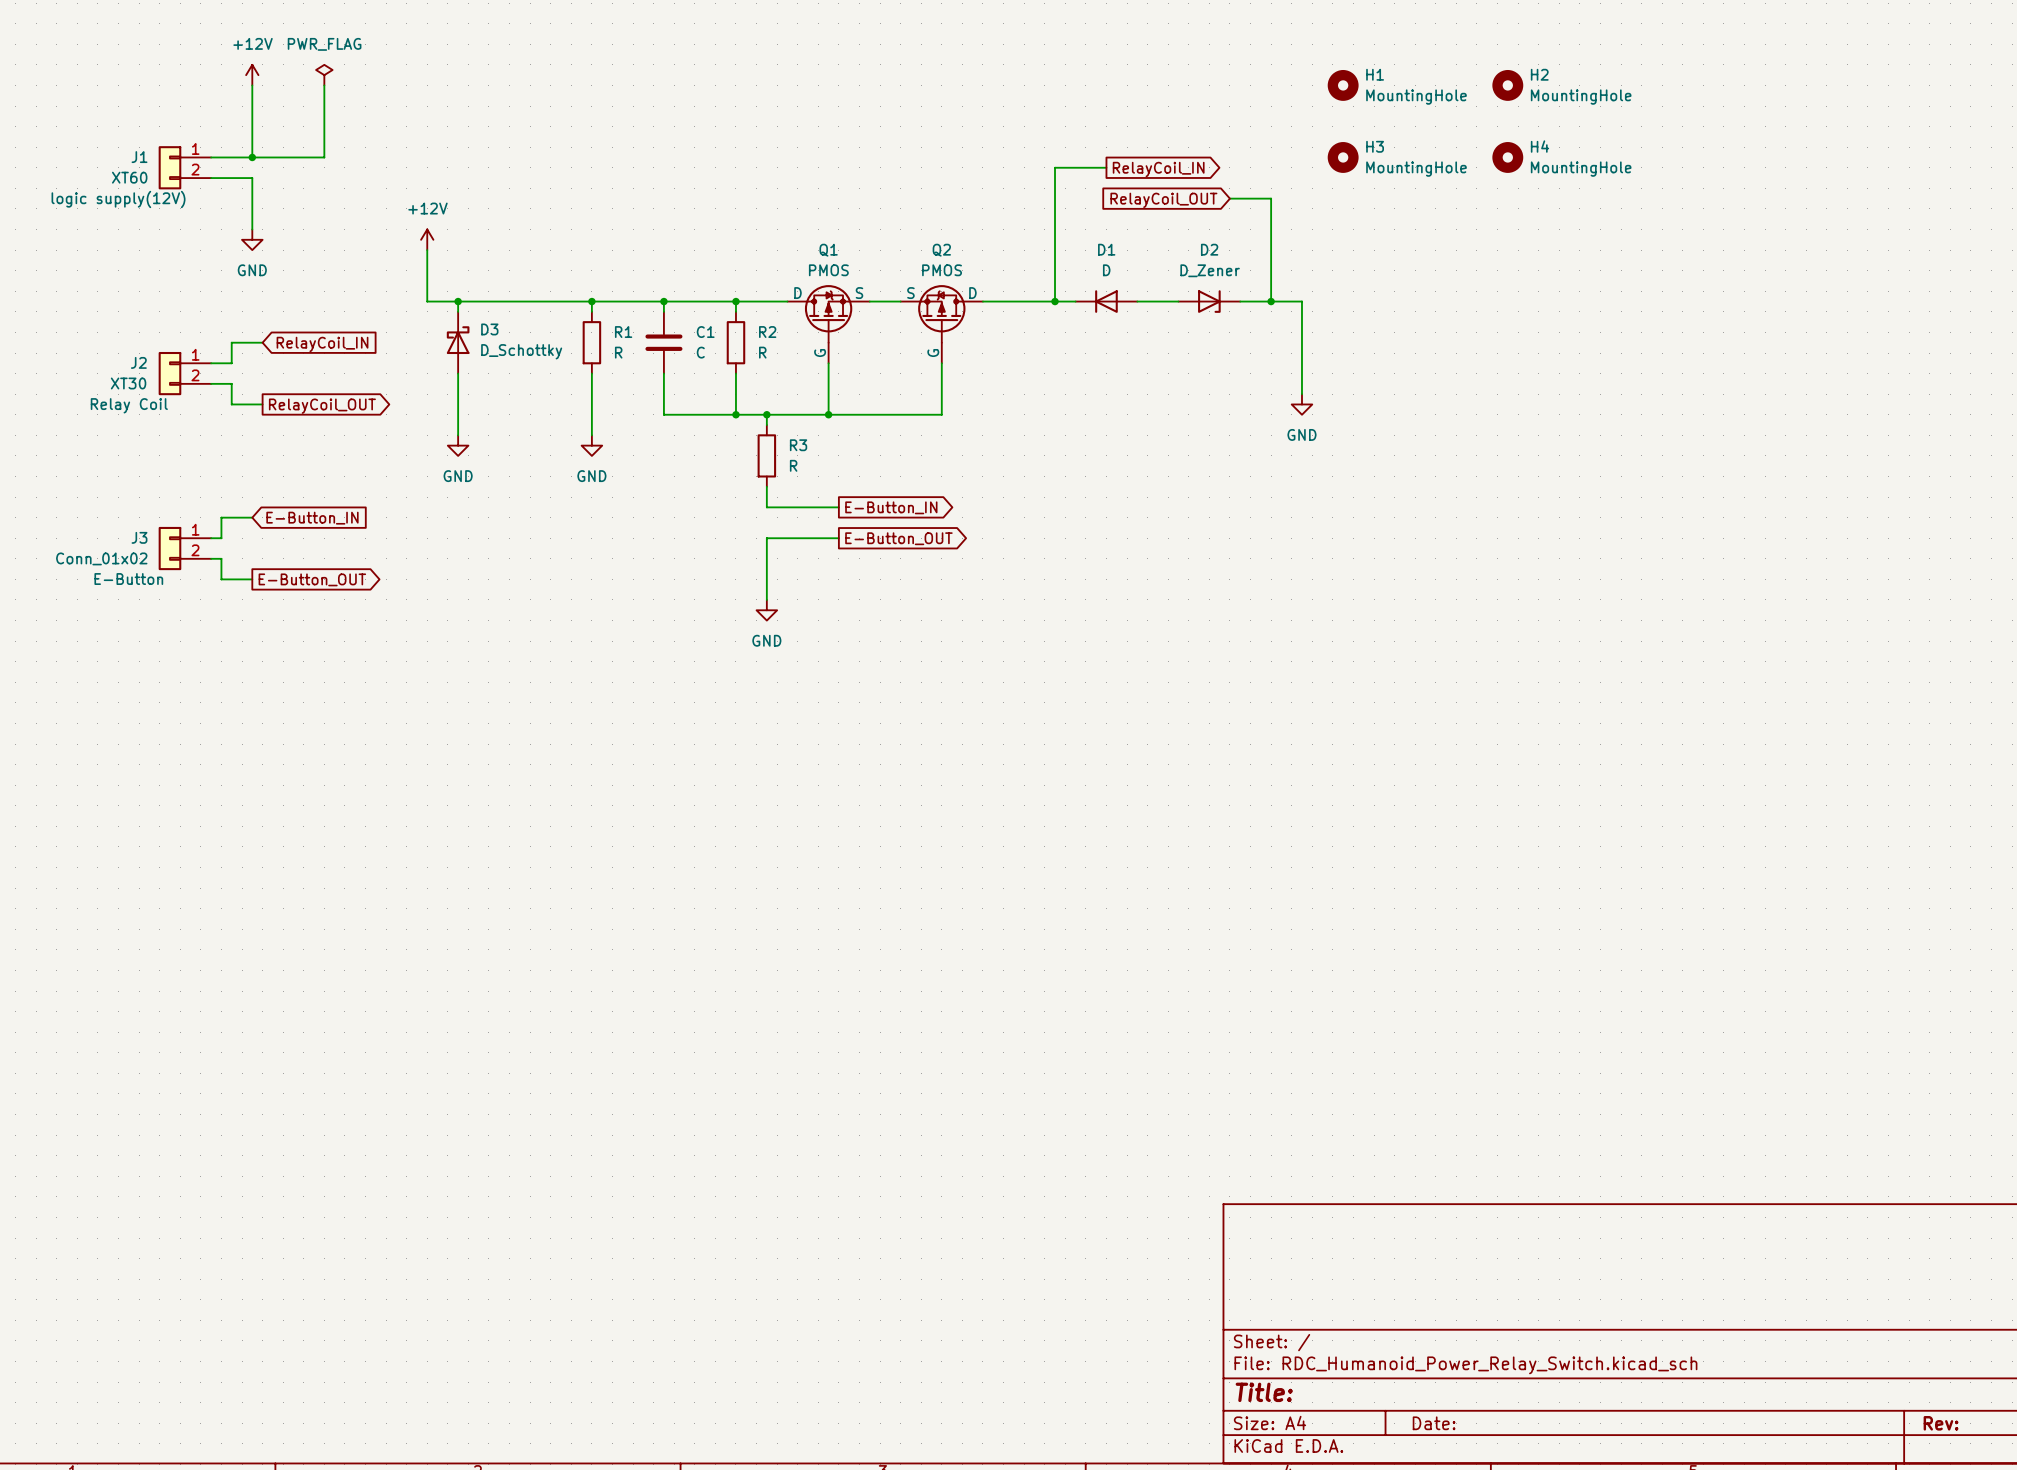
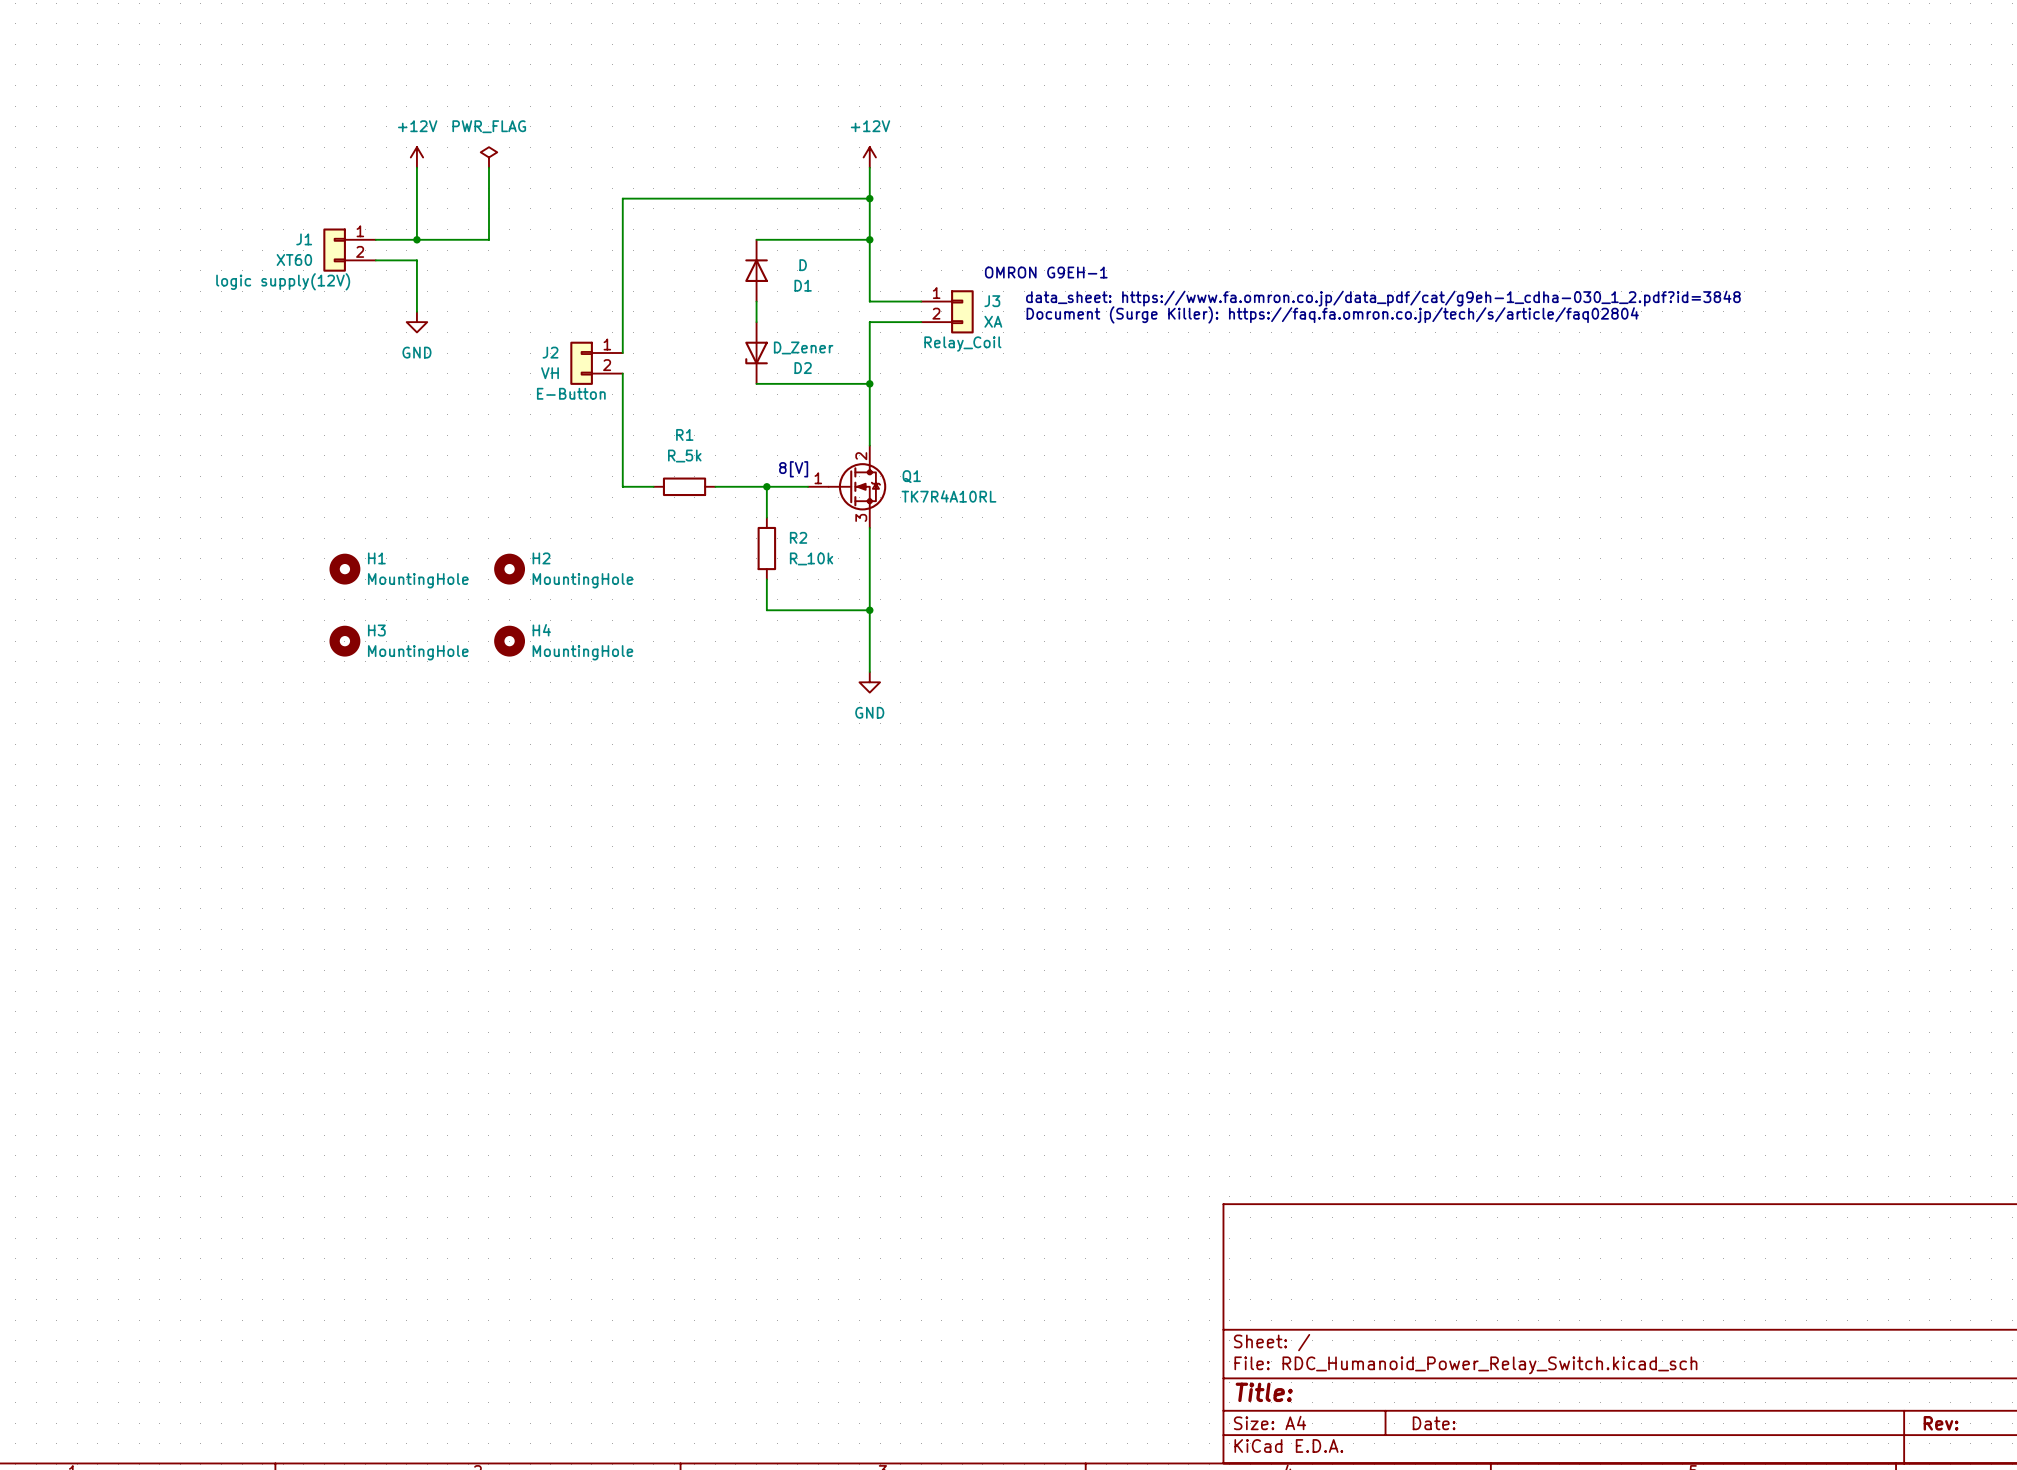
power symbol: +12V (252, 75) -> none
power symbol position: PWR_FLAG (324, 75) -> PWR_FLAG (488, 157)
wire: (252, 85) (252, 157) -> (416, 167) (416, 239)
wire: (324, 85) (324, 157) (211, 157) -> (488, 167) (488, 239) (375, 239)
H1 position: (1343, 85) -> (344, 569)
H2 position: (1507, 85) -> (509, 569)
junction: (252, 157) -> none
power symbol: none -> +12V (869, 157)
H3 position: (1343, 157) -> (344, 641)
H4 position: (1507, 157) -> (509, 641)
J1 position: (184, 167) -> (349, 250)
wire: none -> (869, 167) (869, 301)
wire: (1106, 167) (1055, 167) (1055, 301) -> none
global label: RelayCoil_IN (1158, 169) -> none
wire: (211, 178) (252, 178) (252, 229) -> (375, 260) (416, 260) (416, 311)
wire: none -> (869, 198) (622, 198) (622, 353)
junction: none -> (869, 198)
wire: (1229, 198) (1271, 198) (1271, 301) -> none
global label: RelayCoil_OUT (1163, 200) -> none
power symbol: GND (252, 239) -> none
junction: none -> (416, 239)
power symbol position: +12V (427, 239) -> +12V (416, 157)
wire: none -> (756, 239) (869, 239)
junction: none -> (869, 239)
D1 name position: D1 (1106, 249) -> D1 (803, 285)
D2 name position: D2 (1209, 249) -> D2 (803, 368)
wire: (427, 250) (427, 301) (787, 301) -> none
Q1 name position: Q1 (828, 250) -> Q1 (911, 476)
Q1 value: PMOS (828, 270) -> TK7R4A10RL (948, 496)
D1 value position: D (1106, 270) -> D (803, 265)
D2 value position: D_Zener (1210, 270) -> D_Zener (803, 347)
text: none -> OMRON G9EH-1 (1046, 272)
Q1 symbol: [787, 285, 870, 364] -> [808, 445, 887, 528]
text: none -> data_sheet: https://www.fa.omron.co.jp/data_pdf/cat/g9eh-1_cdha-030_1_2.pdf?id=3848 (1383, 298)
wire: (458, 301) (458, 311) -> none
junction: (458, 301) -> none
wire: (591, 301) (591, 311) -> none
junction: (591, 301) -> none
wire: (663, 301) (663, 311) -> none
junction: (663, 301) -> none
wire: (735, 301) (735, 311) -> none
junction: (735, 301) -> none
wire: none -> (756, 301) (756, 322)
wire: (982, 301) (1075, 301) -> none
junction: (1055, 301) -> none
D1 rotation: 0° (1106, 301) -> 90° clockwise (756, 270)
D1 position: (1106, 301) -> (756, 270)
wire: (1137, 301) (1178, 301) -> none
D2 rotation: 0° (1209, 301) -> 90° clockwise (756, 353)
D2 position: (1209, 301) -> (756, 353)
wire: (1240, 301) (1301, 301) (1301, 394) -> none
junction: (1271, 301) -> none
text: none -> Document (Surge Killer): https://faq.fa.omron.co.jp/tech/s/article/faq02804 (1332, 314)
power symbol: none -> GND (416, 322)
wire: none -> (921, 322) (869, 322) (869, 445)
Q2: PMOS (941, 324) -> none
R1 name position: R1 (623, 332) -> R1 (684, 434)
wire: (262, 342) (231, 342) (231, 363) (211, 363) -> none
D3: D_Schottky (458, 342) -> none
R1 rotation: 0° (591, 342) -> 90° clockwise (684, 486)
R1 position: (591, 342) -> (684, 486)
C1: C (663, 342) -> none
R2 position: (735, 342) -> (766, 548)
global label: RelayCoil_IN (322, 344) -> none
R1 value: R (618, 352) -> R_5k (684, 456)
R2 value: R (762, 352) -> R_10k (811, 558)
wire: (828, 363) (828, 414) -> none
wire: (941, 363) (941, 414) (663, 414) (663, 373) -> none
J2 position: (184, 373) -> (596, 363)
wire: (458, 373) (458, 435) -> none
wire: (591, 373) (591, 435) -> none
wire: none -> (622, 373) (622, 486) (653, 486)
wire: (735, 373) (735, 414) -> none
J2 value: XT30 (128, 383) -> VH (550, 373)
wire: (211, 383) (231, 383) (231, 404) (262, 404) -> none
wire: none -> (756, 383) (869, 383)
junction: none -> (869, 383)
power symbol: GND (1301, 404) -> none
J2 text: Relay Coil (129, 405) -> E-Button (571, 393)
global label: RelayCoil_OUT (322, 406) -> none
junction: (735, 414) -> none
wire: (766, 414) (766, 425) -> none
junction: (766, 414) -> none
junction: (828, 414) -> none
power symbol: GND (458, 445) -> none
power symbol: GND (591, 445) -> none
R3: R (766, 455) -> none
text: none -> 8[V] (793, 469)
wire: none -> (715, 486) (808, 486)
junction: none -> (766, 486)
wire: (766, 507) (838, 507) -> (766, 507) (766, 517)
global label: E-Button_IN (891, 507) -> none
wire: (252, 517) (221, 517) (221, 538) (211, 538) -> none
global label: E-Button_IN (312, 518) -> none
wire: none -> (869, 527) (869, 672)
wire: (838, 538) (766, 538) (766, 579) -> none
global label: E-Button_OUT (898, 538) -> none
J3 flip: as is (169, 548) -> left-right (962, 311)
J3 position: (184, 548) -> (947, 311)
J3 value: Conn_01x02 (101, 558) -> XA (993, 321)
wire: (211, 558) (221, 558) (221, 579) (252, 579) -> none
J3 text: E-Button (128, 579) -> Relay_Coil (962, 344)
global label: E-Button_OUT (312, 579) -> none
wire: none -> (766, 599) (766, 610) (869, 610)
power symbol position: GND (766, 610) -> GND (869, 682)
junction: none -> (869, 610)

